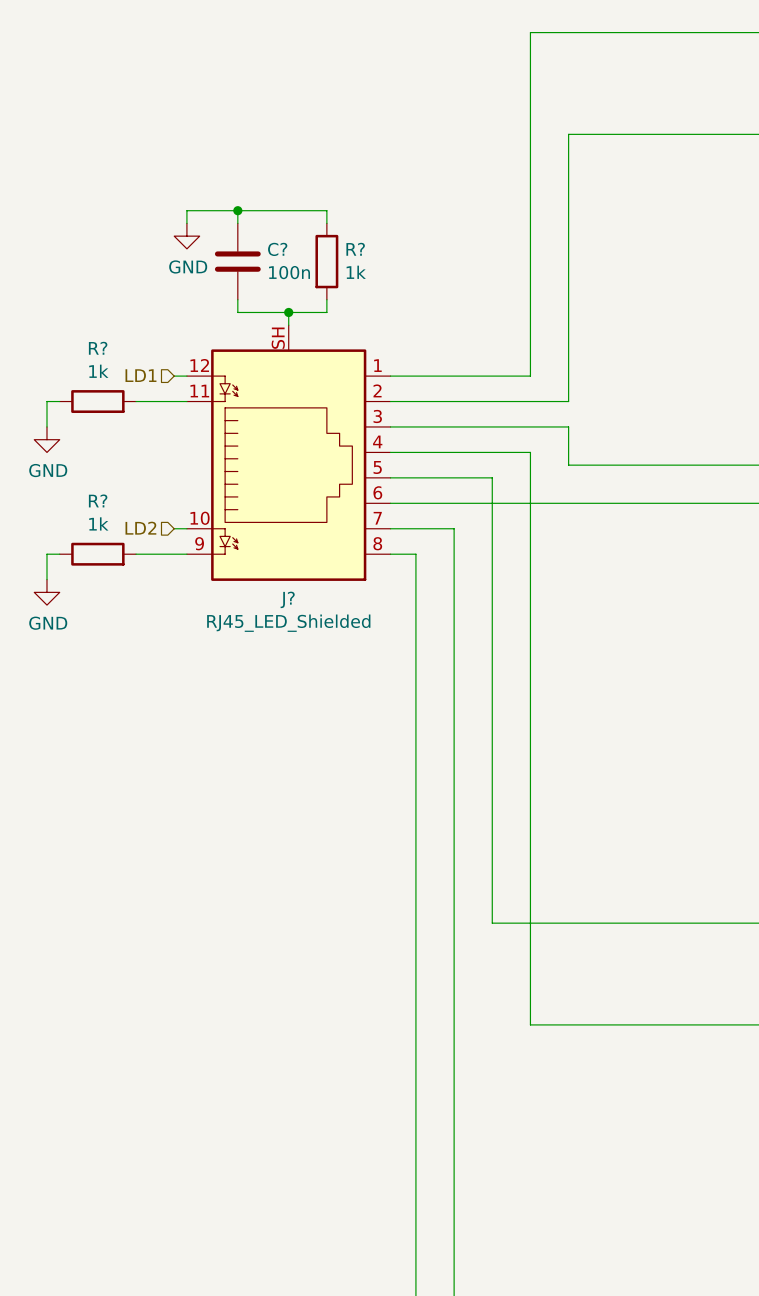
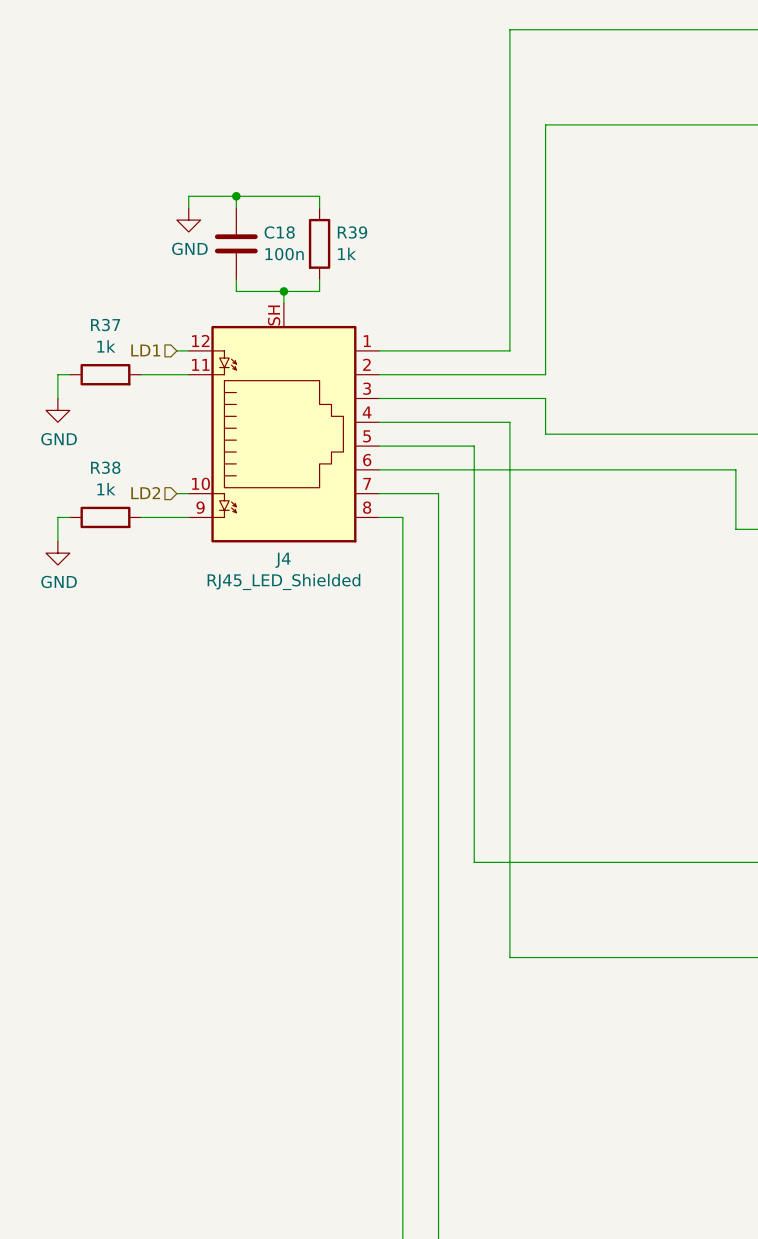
C? name: C? (277, 249) -> C18 (279, 232)
R? name: R? (355, 249) -> R39 (352, 232)
R? name: R? (98, 348) -> R37 (105, 325)
R? name: R? (98, 500) -> R38 (105, 467)
J? name: J? (287, 599) -> J4 (283, 560)

